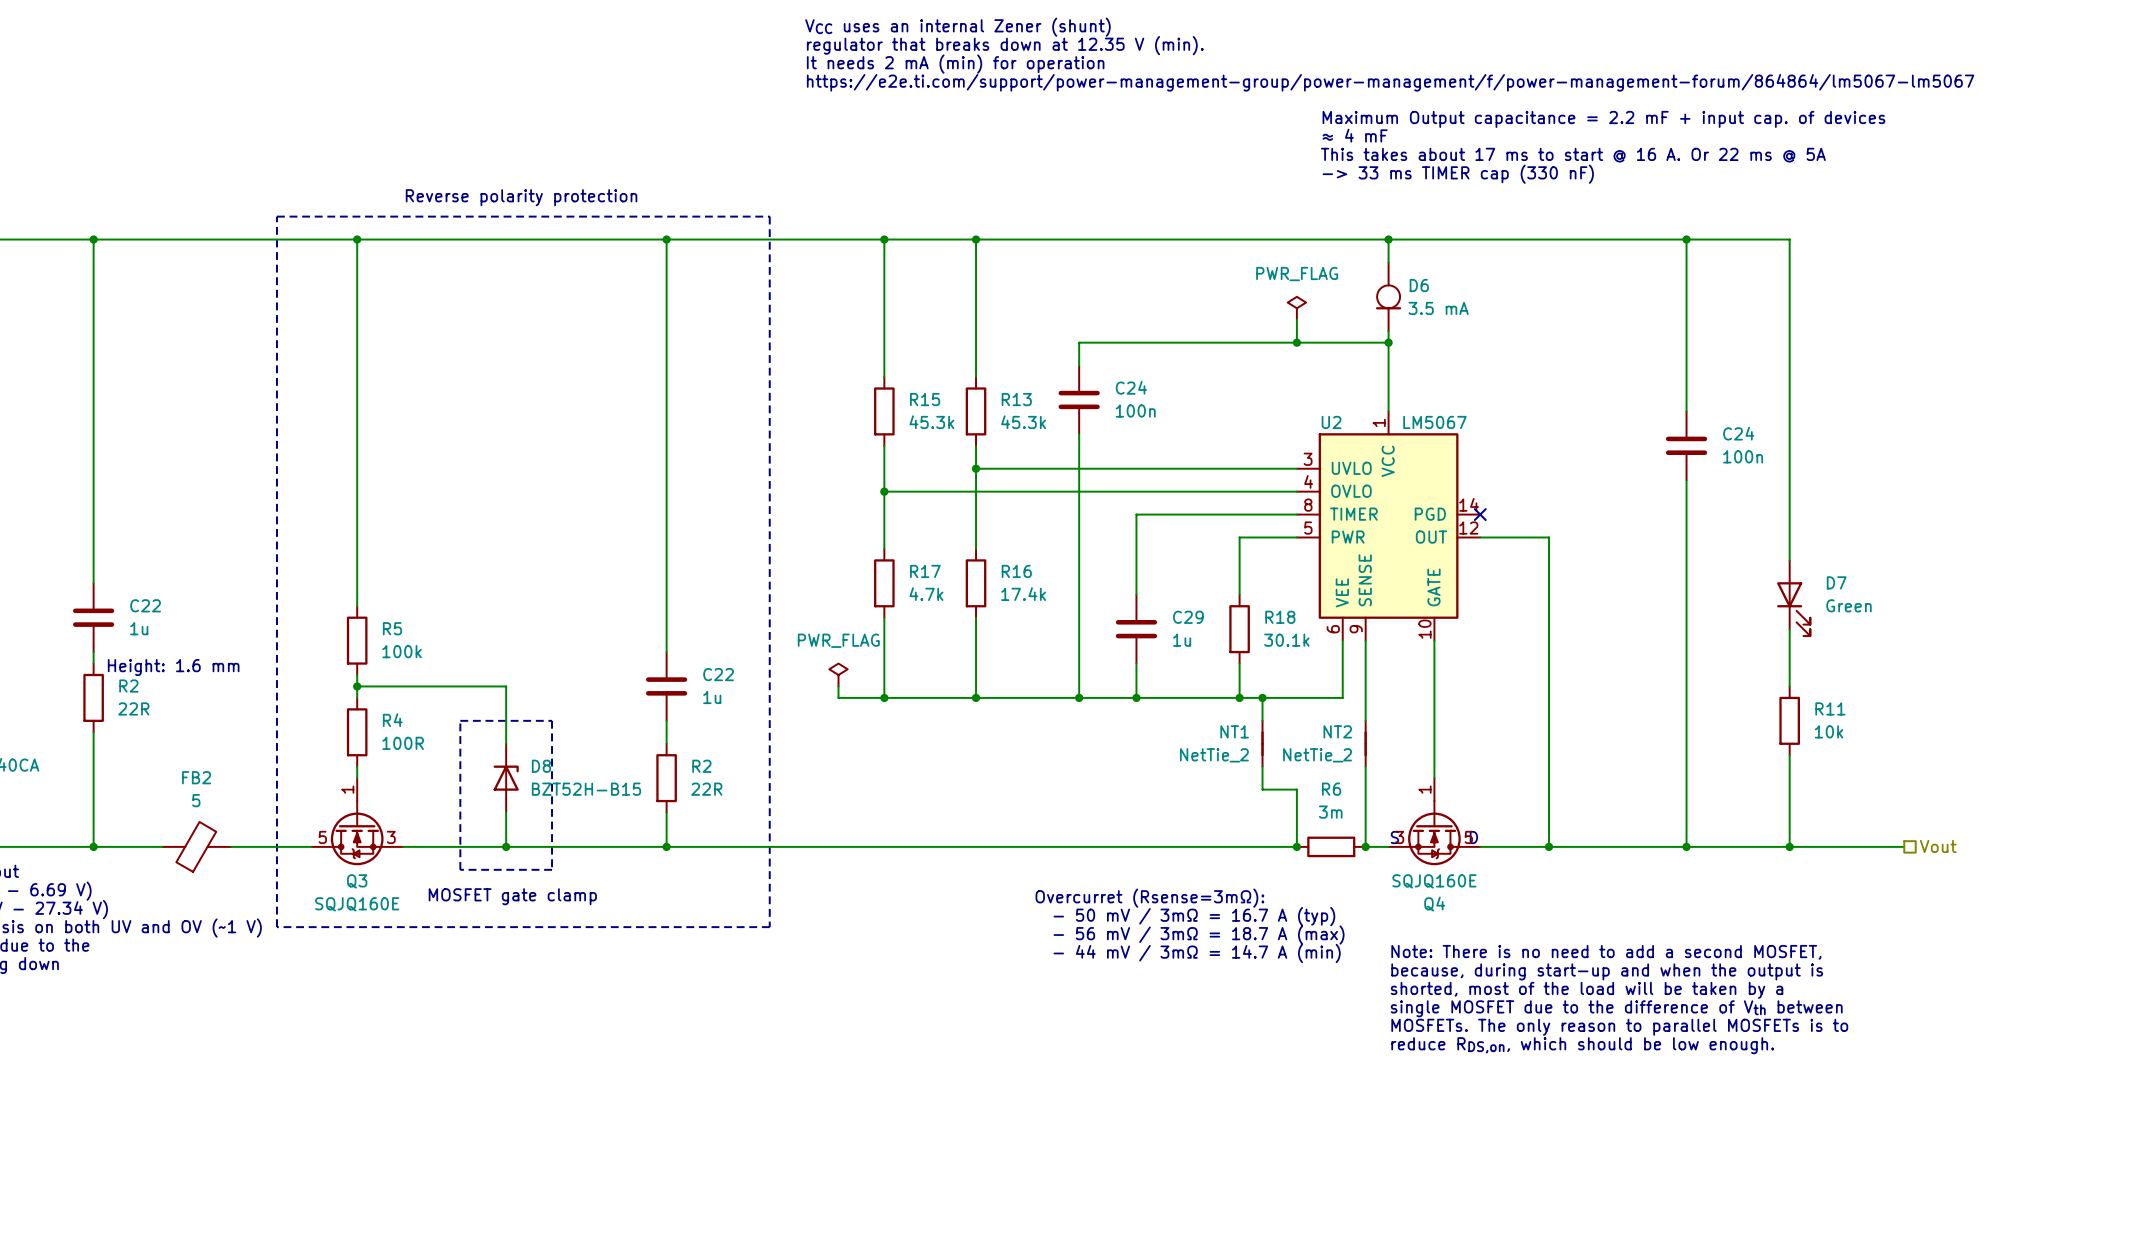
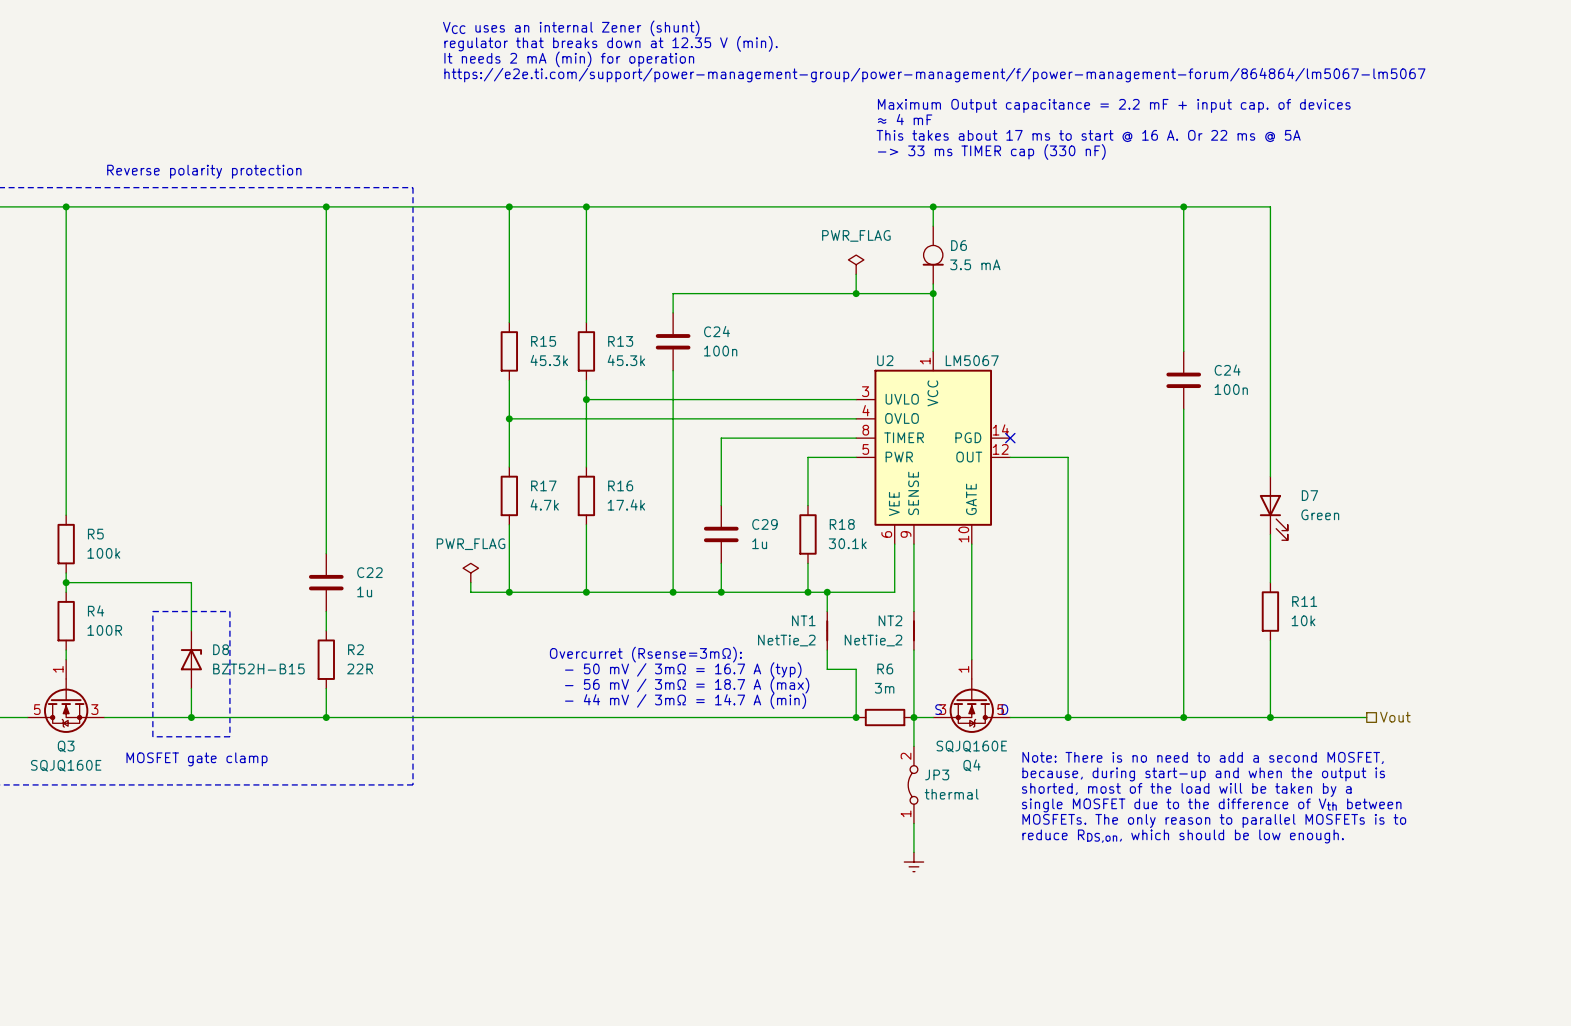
wire: none -> (913, 717) (913, 746)
text position: Overcurret (Rsense=3mΩ): (1149, 898) -> Overcurret (Rsense=3mΩ): (645, 654)
text position: - 50 mV / 3mΩ = 16.7 A (typ) (1194, 916) -> - 50 mV / 3mΩ = 16.7 A (typ) (683, 670)
JP3: none -> thermal (913, 784)
text position: - 56 mV / 3mΩ = 18.7 A (max) (1199, 935) -> - 56 mV / 3mΩ = 18.7 A (max) (687, 685)
text position: Note: There is no need to add a second MOSFET, (1606, 952) -> Note: There is no need to add a second MOSFET, (1203, 758)
text position: - 44 mV / 3mΩ = 14.7 A (min) (1197, 953) -> - 44 mV / 3mΩ = 14.7 A (min) (685, 701)
text position: because, during start-up and when the output is (1607, 971) -> because, during start-up and when the output is (1203, 774)
wire: none -> (913, 823) (913, 852)
text position: shorted, most of the load will be taken by a (1587, 990) -> shorted, most of the load will be taken by a (1186, 789)
text position: single MOSFET due to the difference of Vth between (1616, 1008) -> single MOSFET due to the difference of Vth between (1211, 805)
power symbol: none -> (913, 862)
text position: MOSFETs. The only reason to parallel MOSFETs is to (1619, 1027) -> MOSFETs. The only reason to parallel MOSFETs is to (1214, 820)
text position: reduce RDS,on, which should be low enough. (1582, 1045) -> reduce RDS,on, which should be low enough. (1183, 836)

